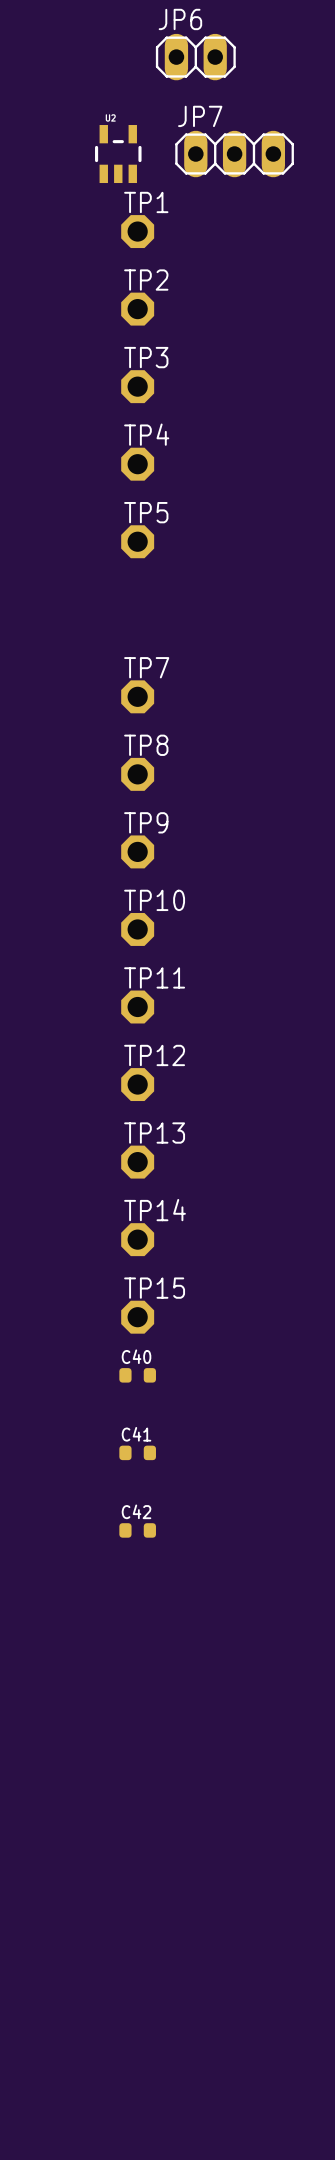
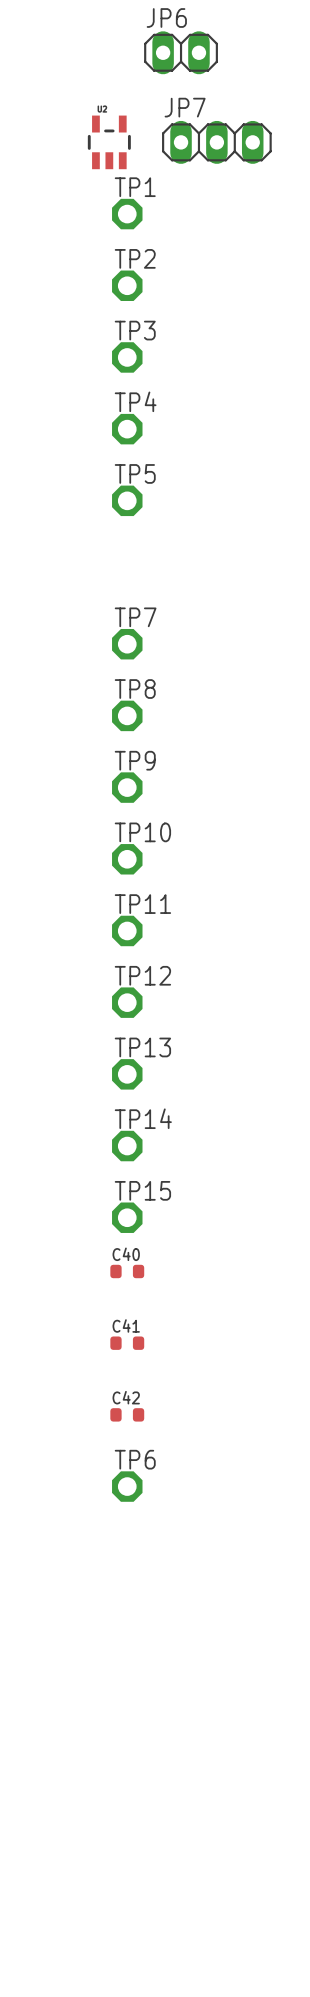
TP6: none -> (127, 1486)

